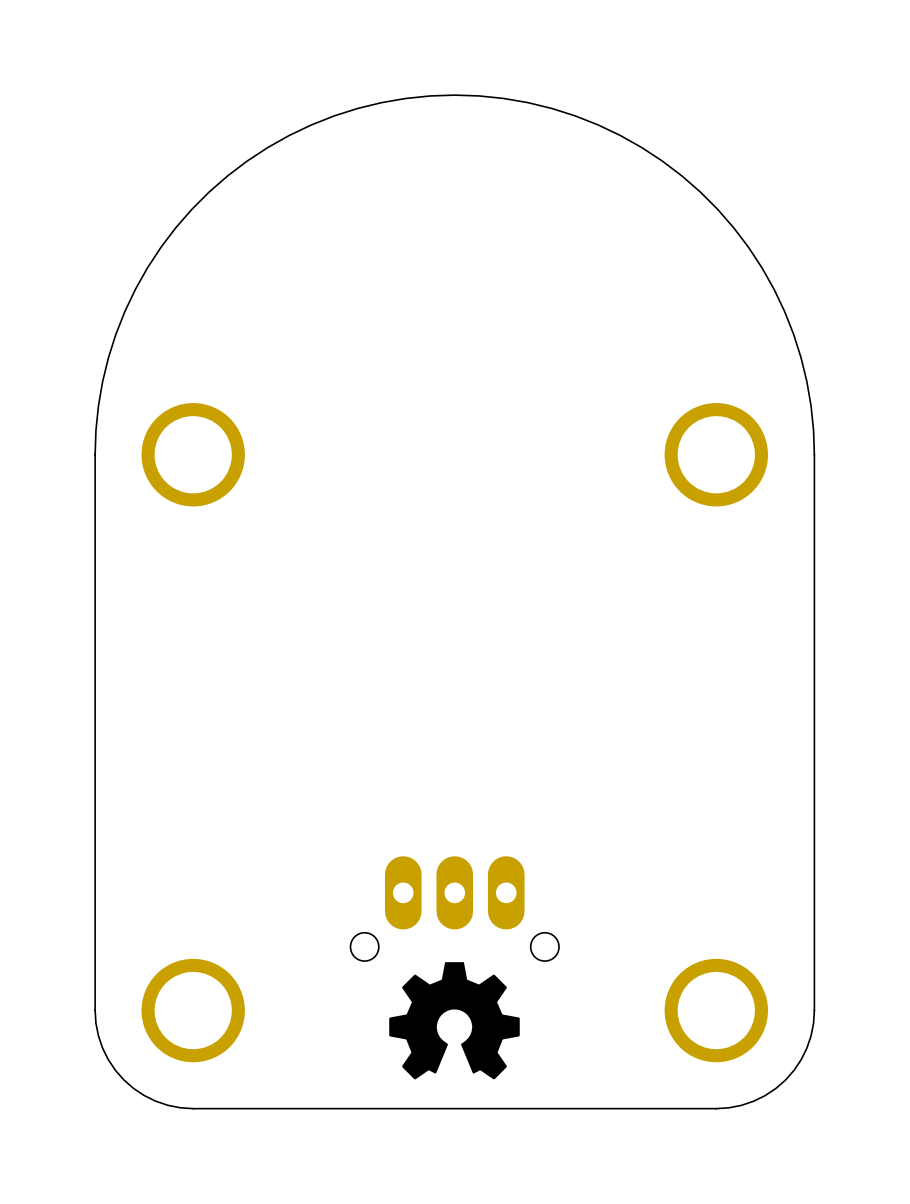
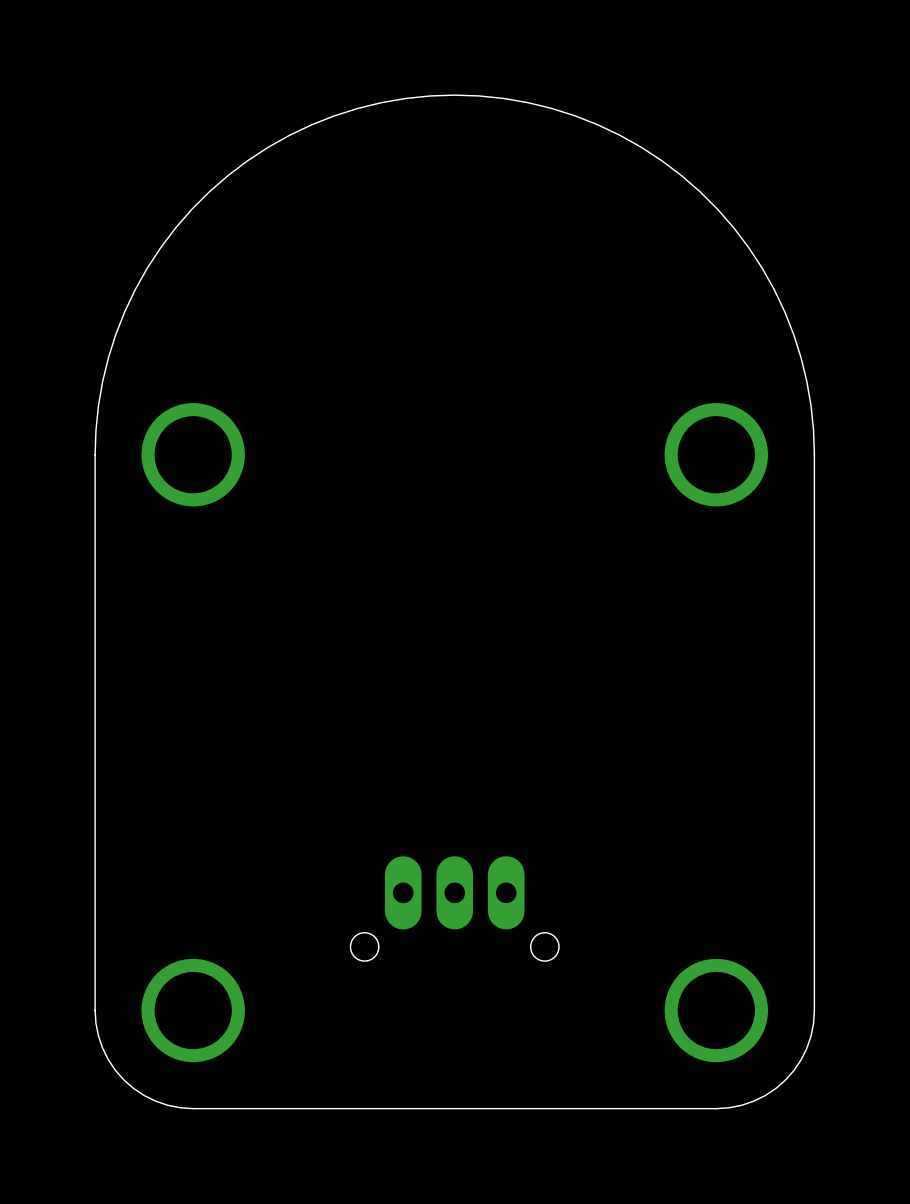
drawing: [389, 962, 520, 1080] -> none

